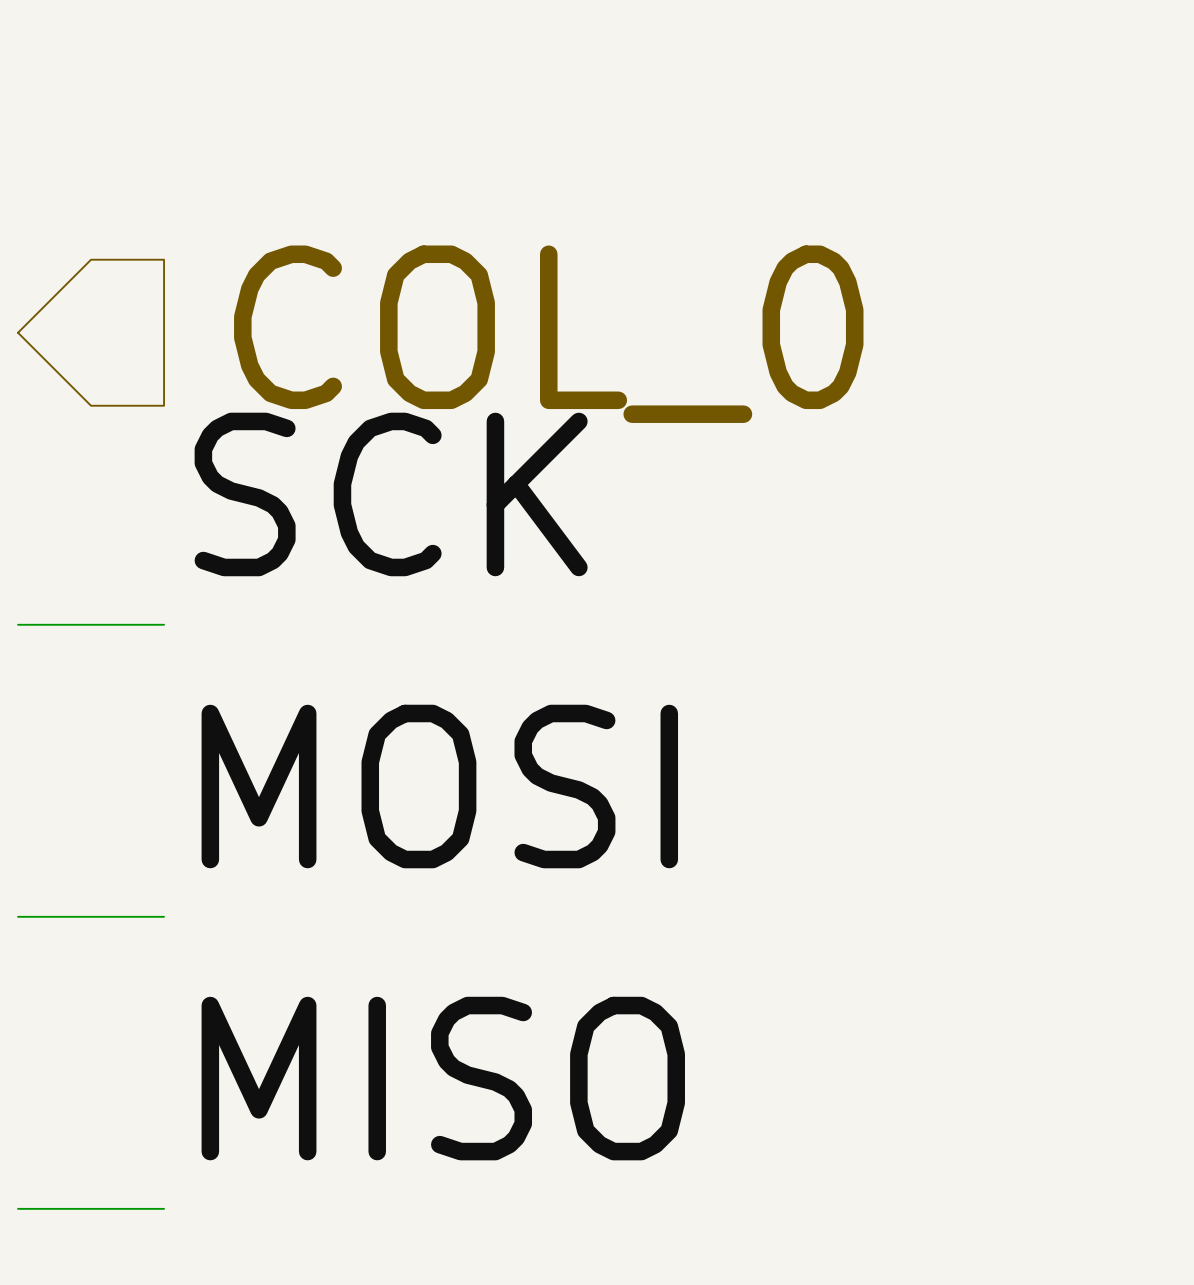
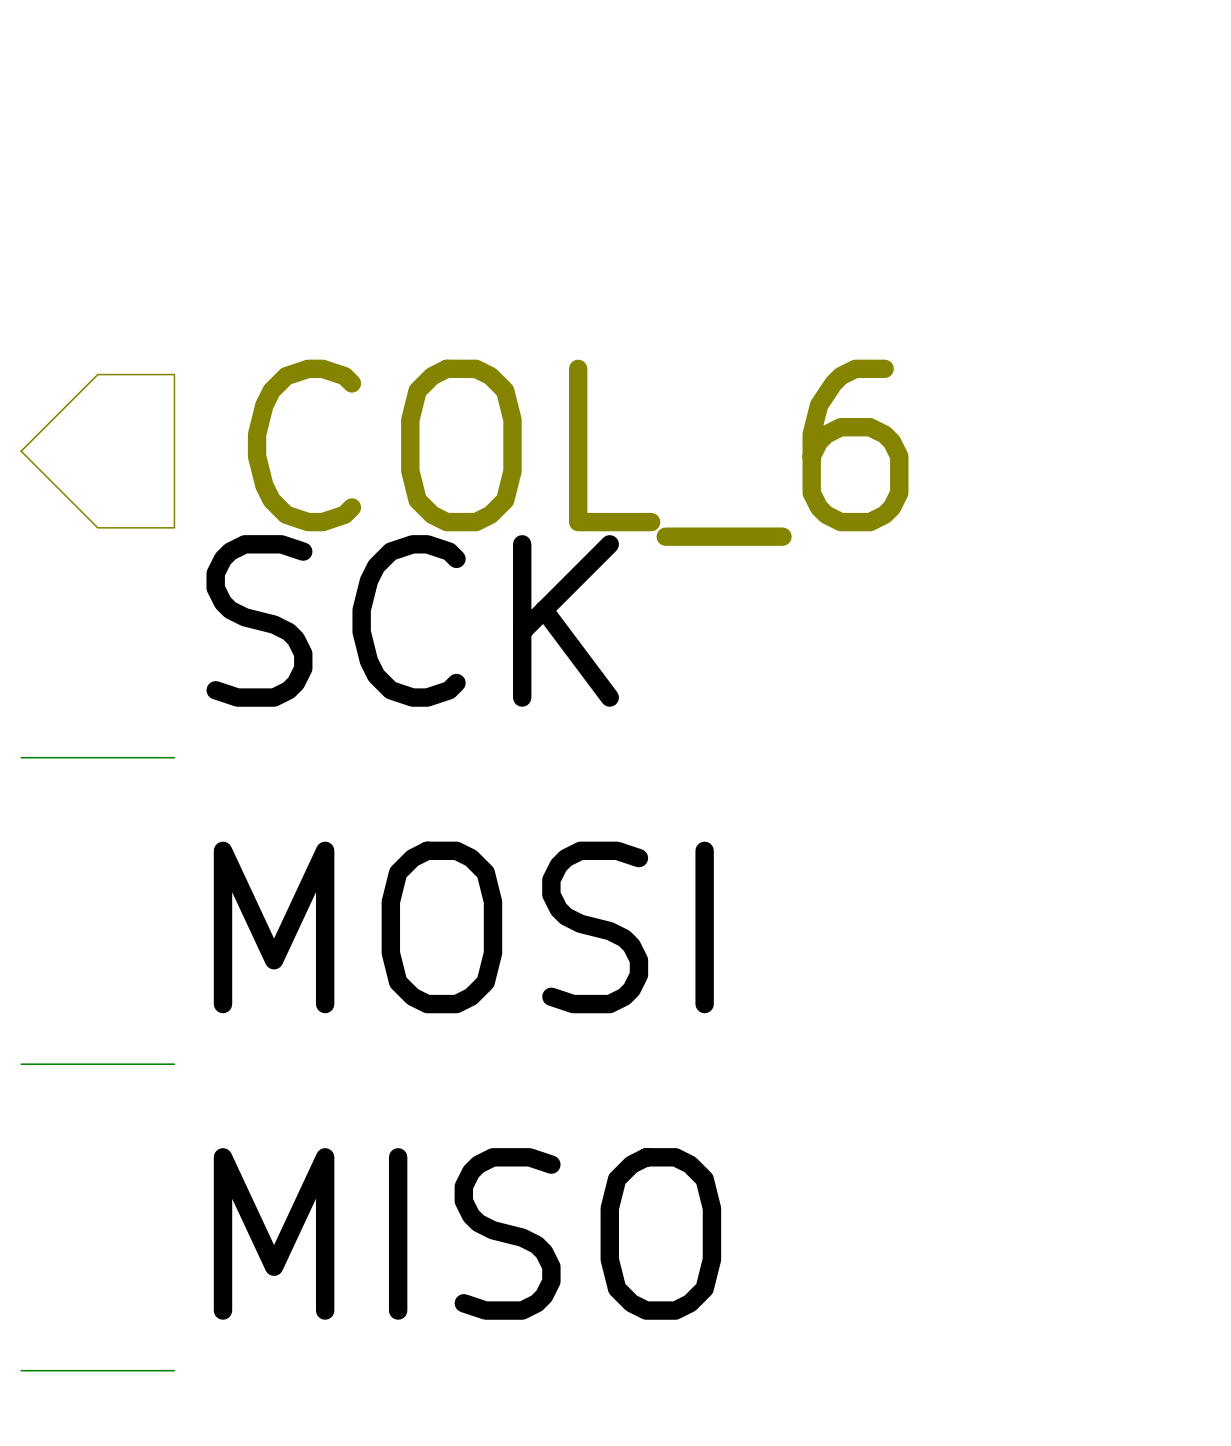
hierarchical label: COL_0 (548, 334) -> COL_6 (578, 452)

